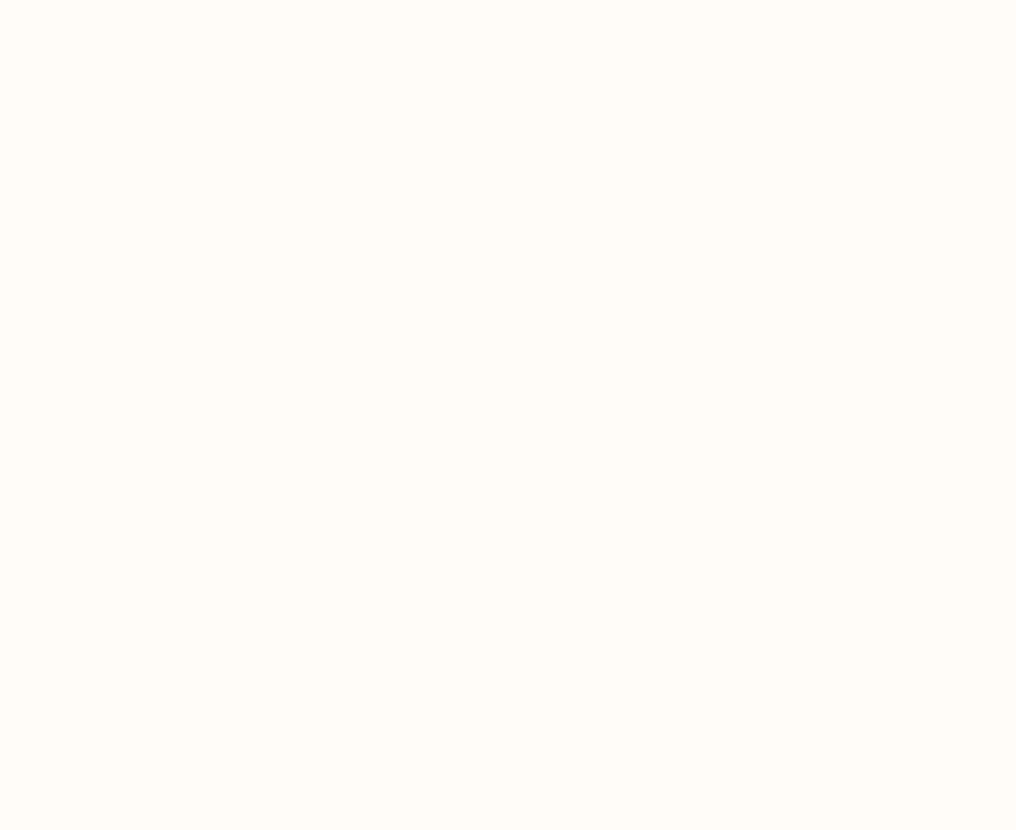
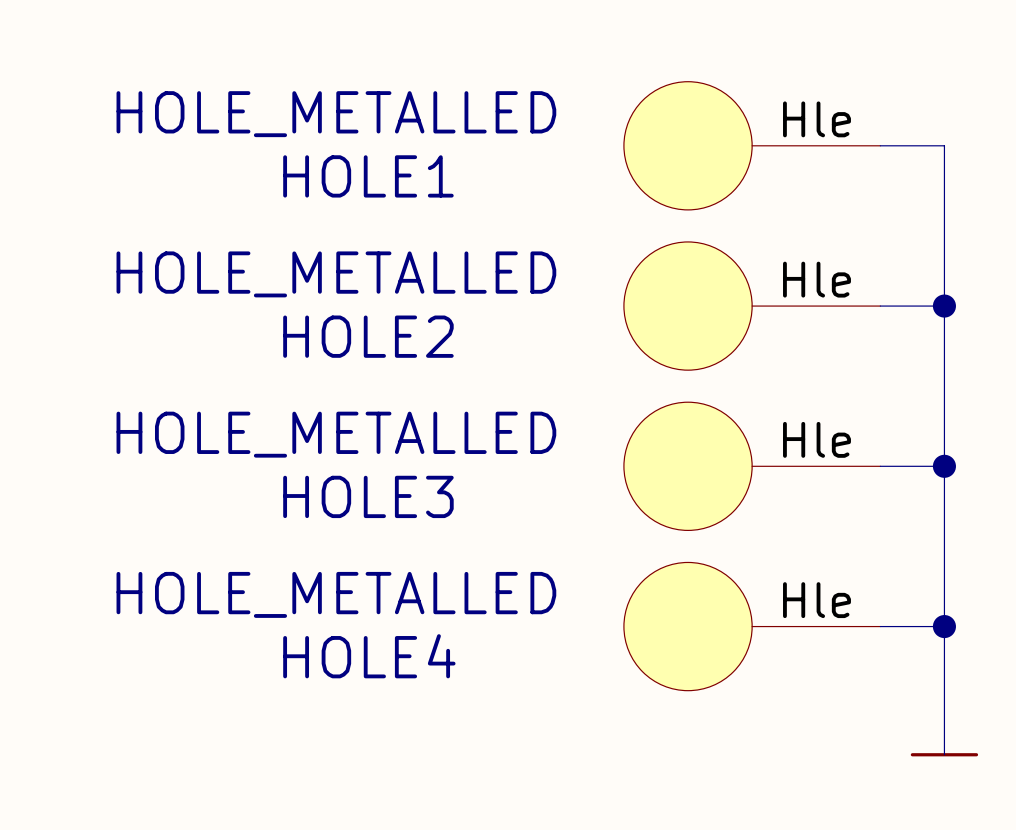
HOLE1: none -> HOLE_METALLED (752, 145)
wire: none -> (880, 145) (944, 145) (944, 754)
HOLE2: none -> HOLE_METALLED (752, 306)
wire: none -> (880, 306) (944, 306)
junction: none -> (944, 306)
HOLE3: none -> HOLE_METALLED (752, 466)
wire: none -> (880, 466) (944, 466)
junction: none -> (944, 466)
HOLE4: none -> HOLE_METALLED (752, 626)
wire: none -> (880, 626) (944, 626)
junction: none -> (944, 626)
power symbol: none -> (944, 754)

